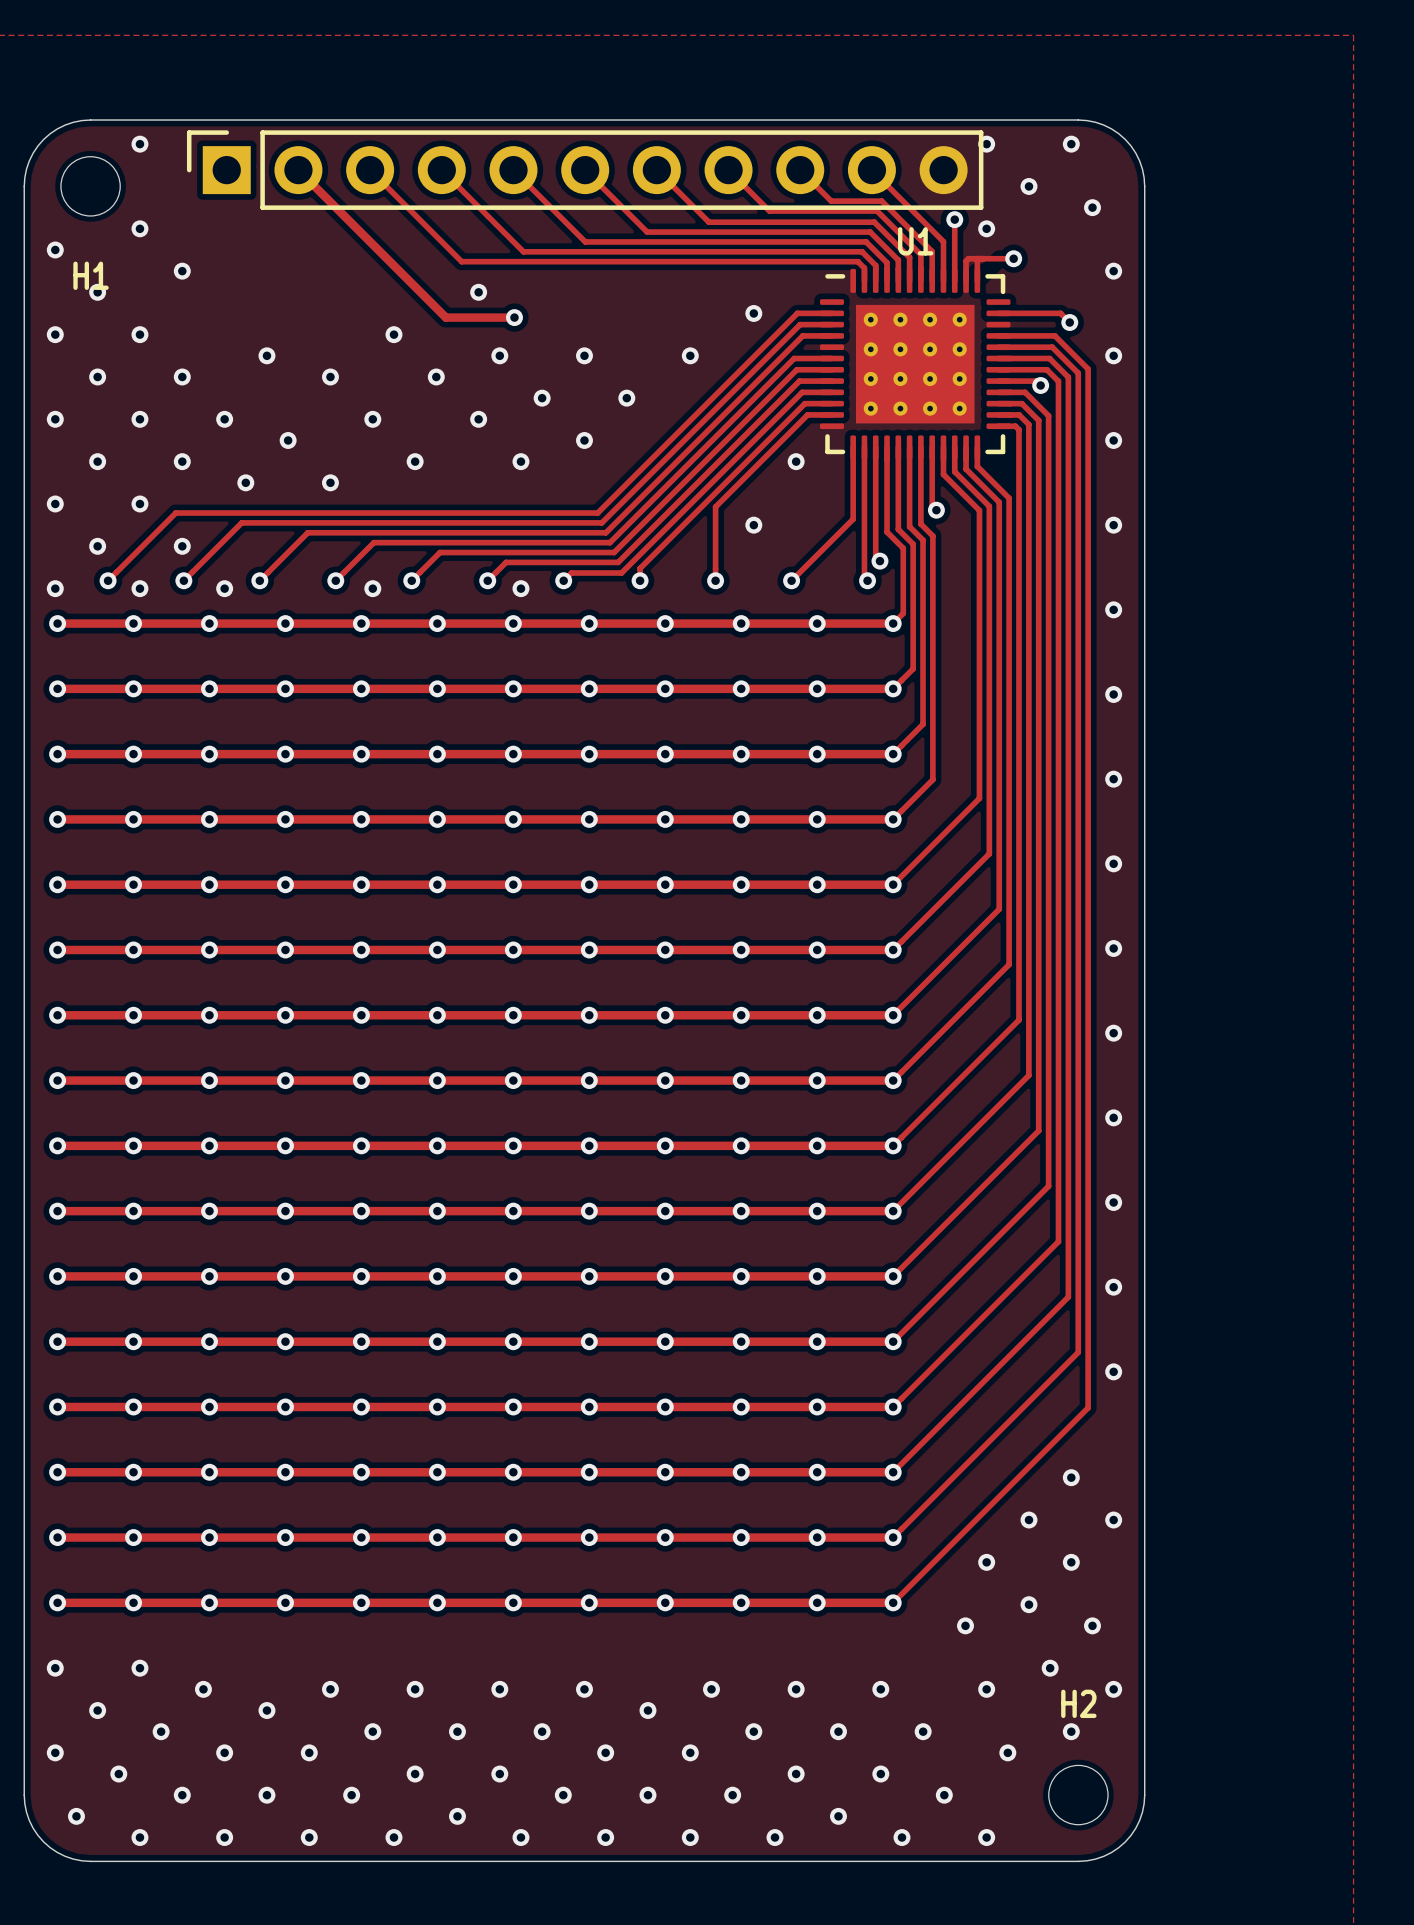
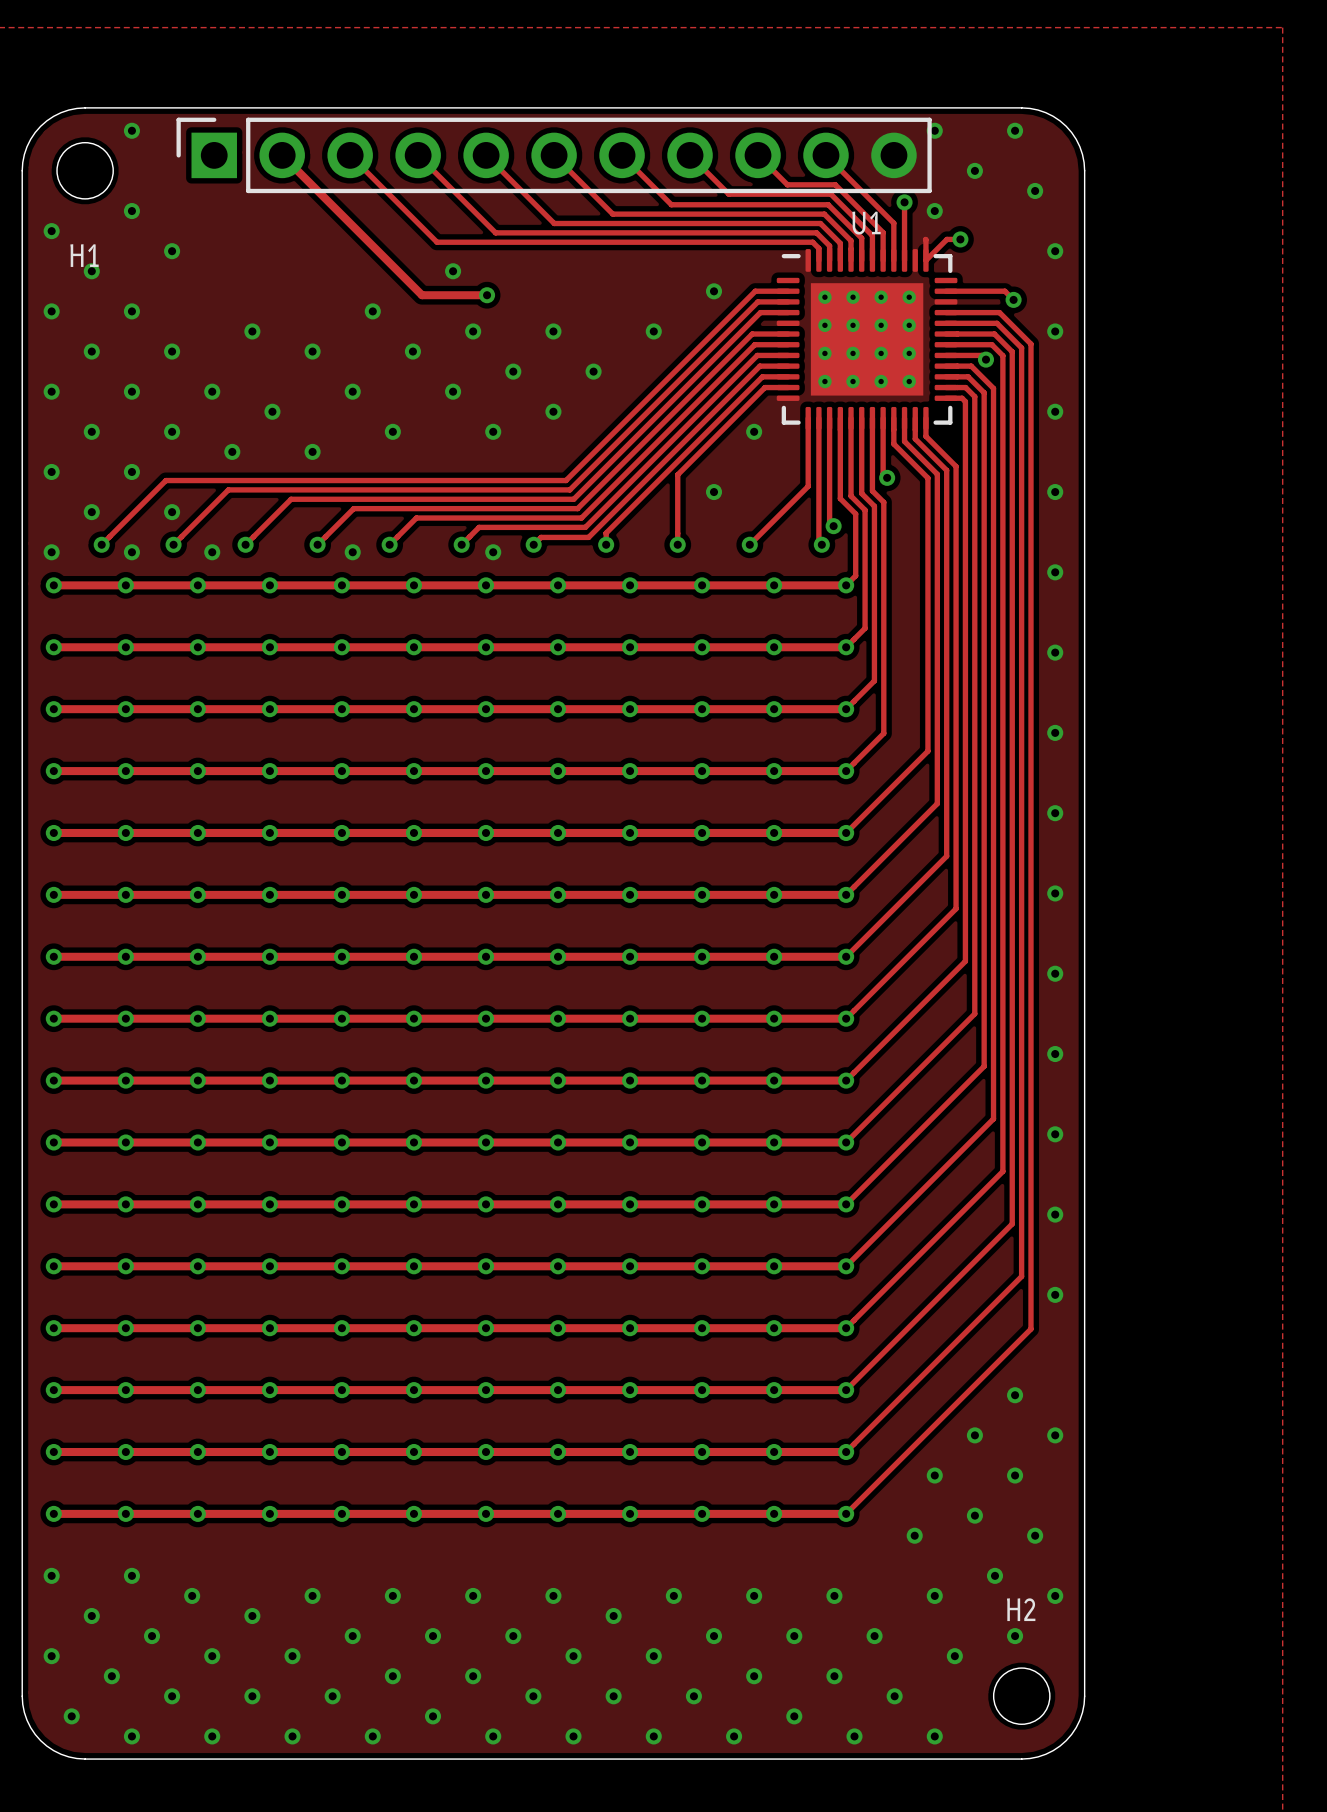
track: (999, 258) (968, 258) (966, 261) (966, 280) -> (946, 239) (925, 260)

